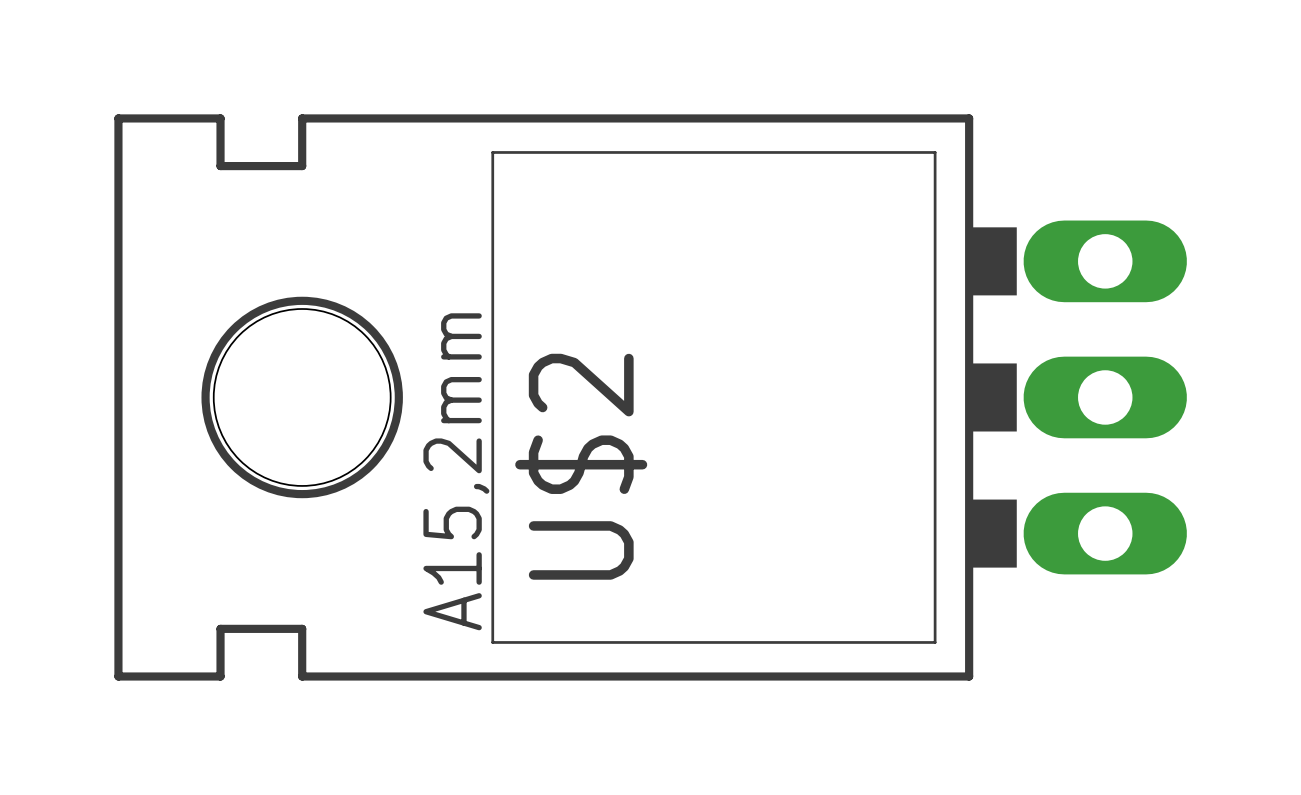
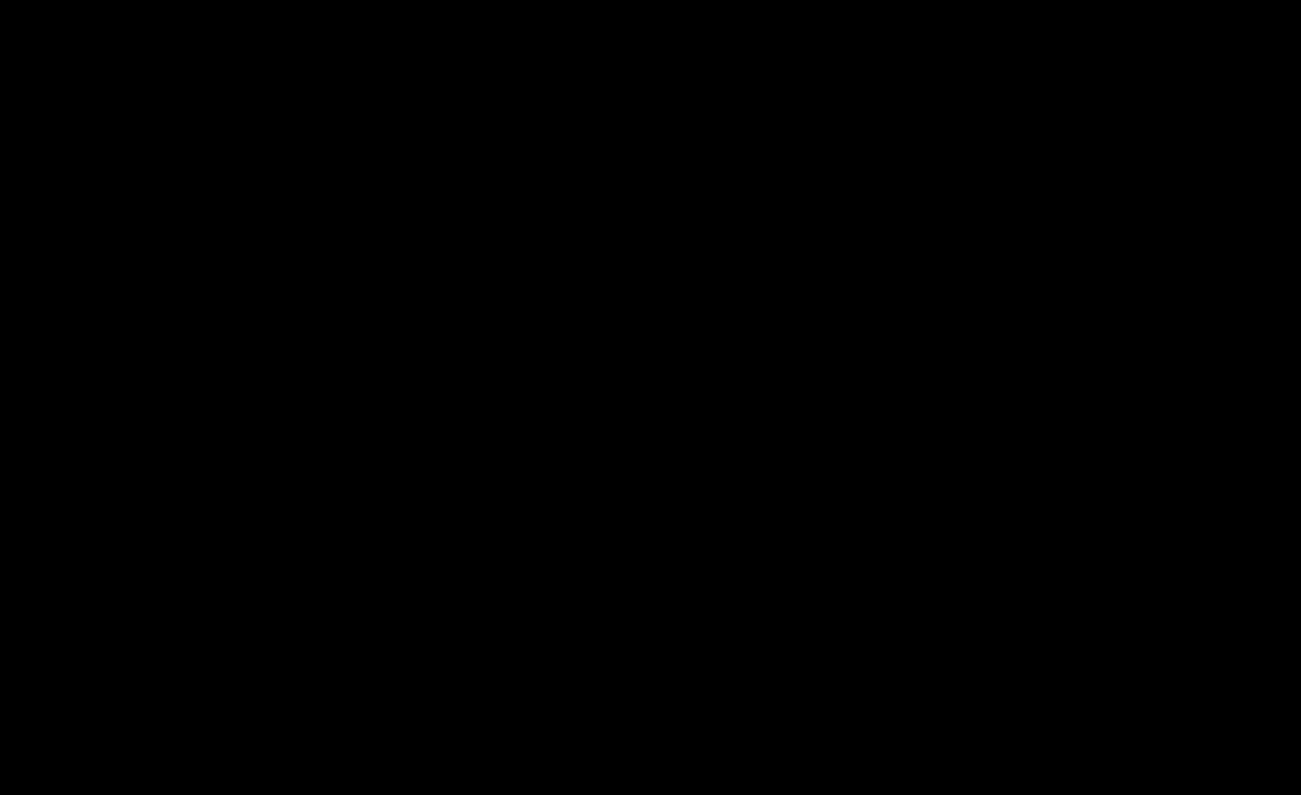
U$2: (650, 397) -> none

